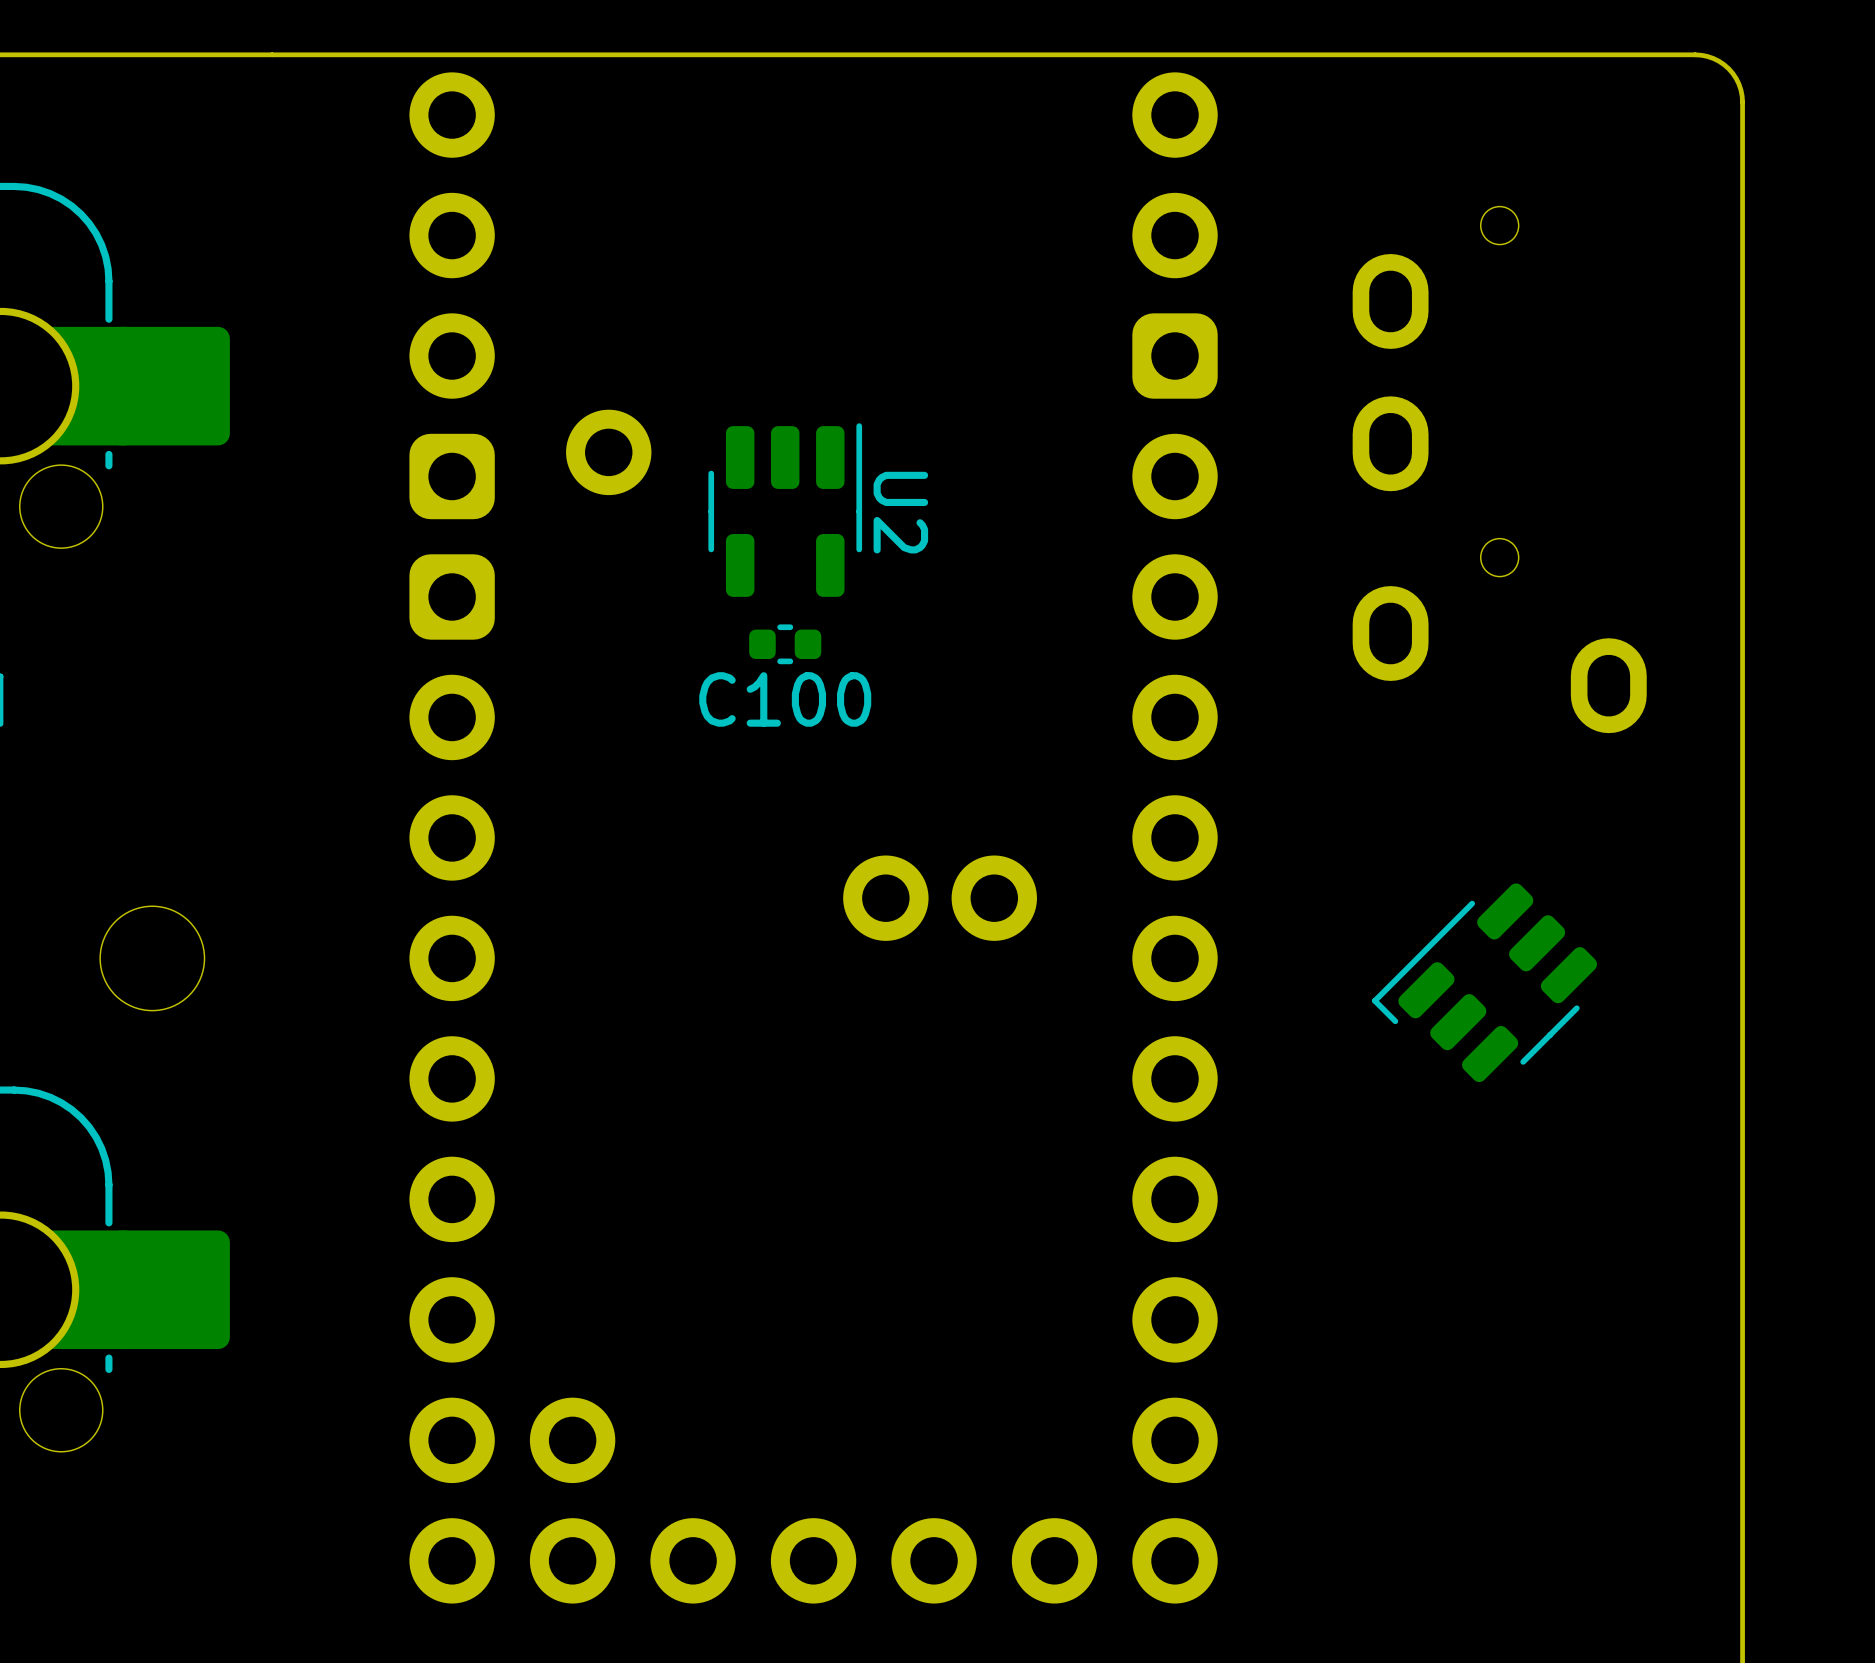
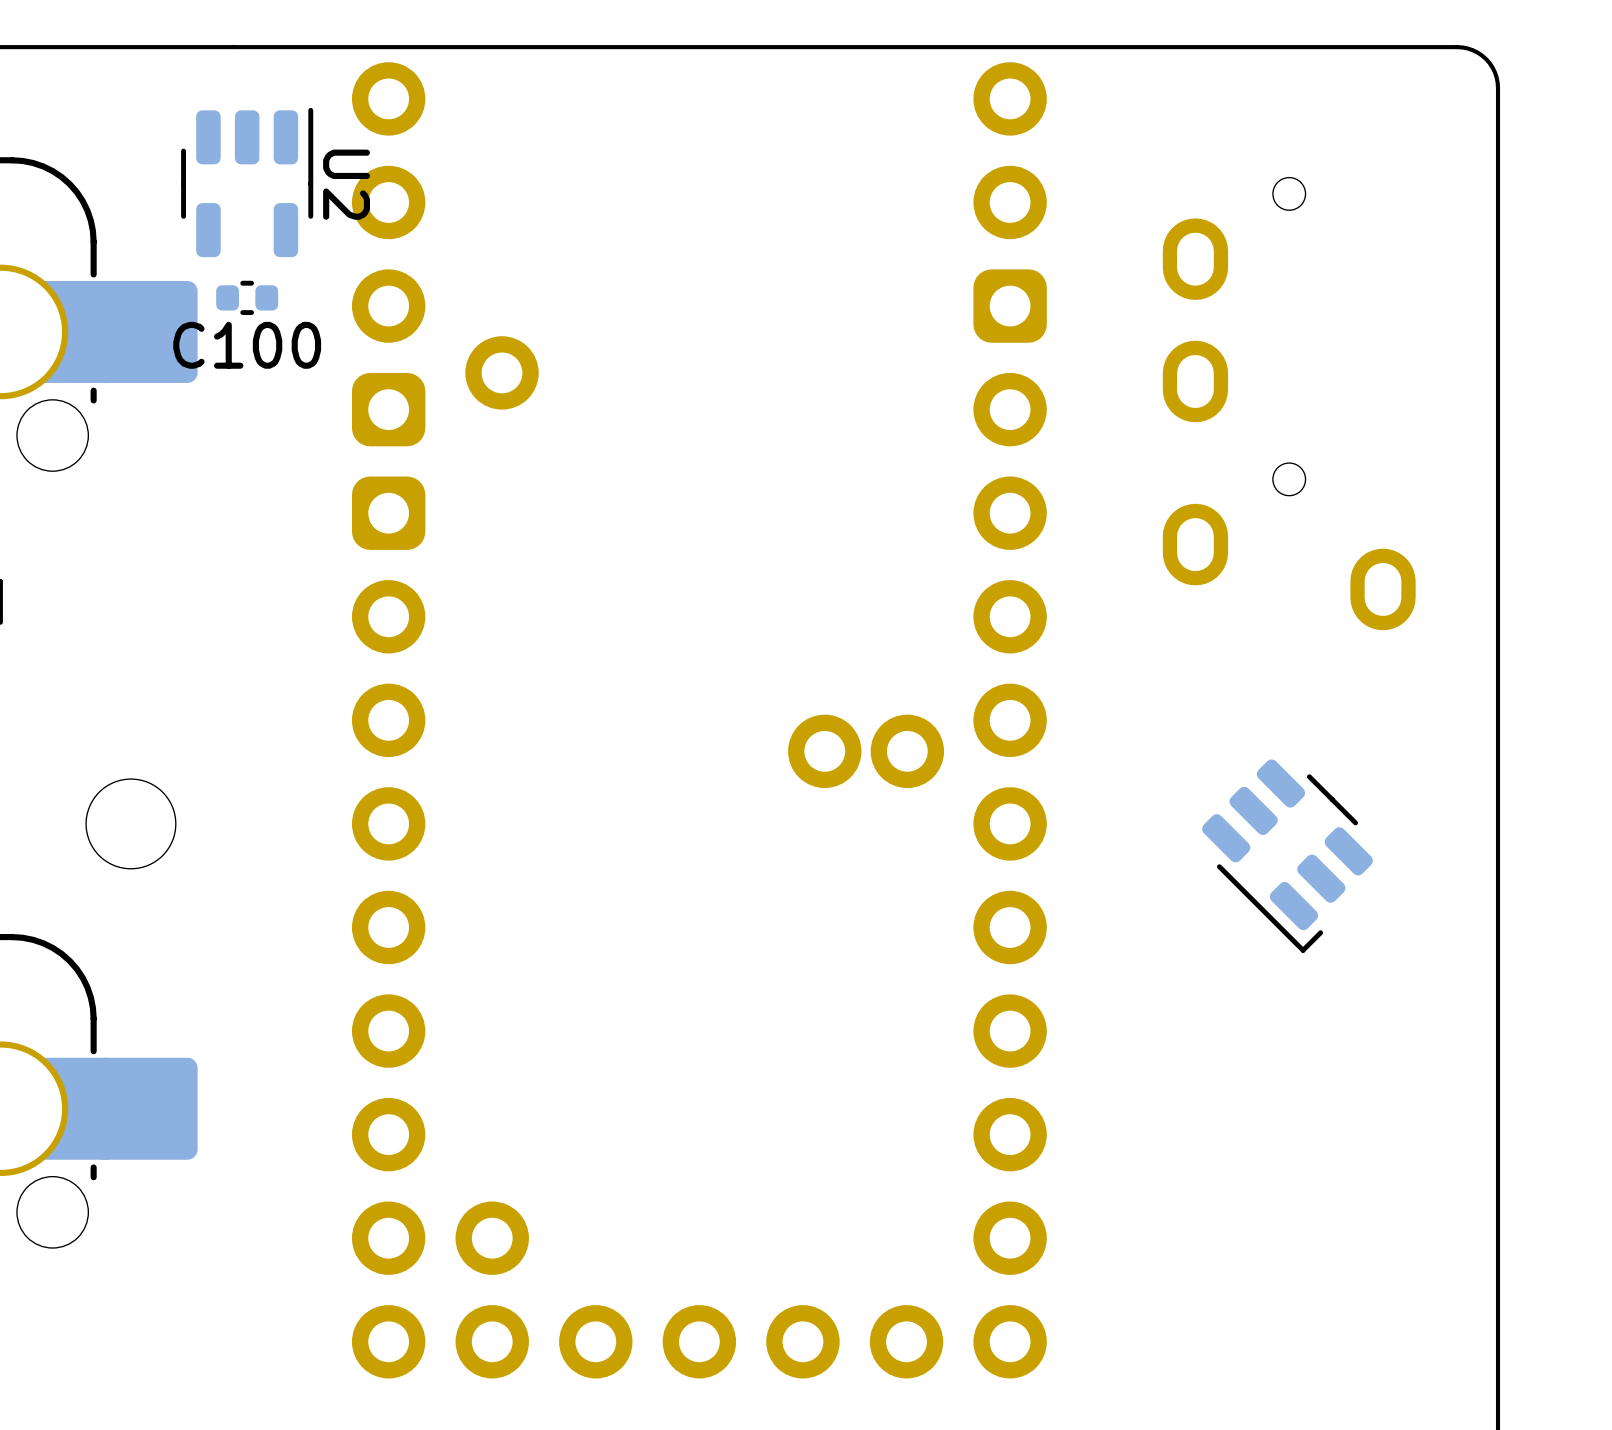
part footprint: [409, 72, 1218, 1604] -> [351, 62, 1047, 1379]
U2 position: (785, 510) -> (247, 182)
C100 position: (785, 644) -> (247, 297)
part rotation: 0° (1484, 982) -> 90° counterclockwise (1287, 856)

